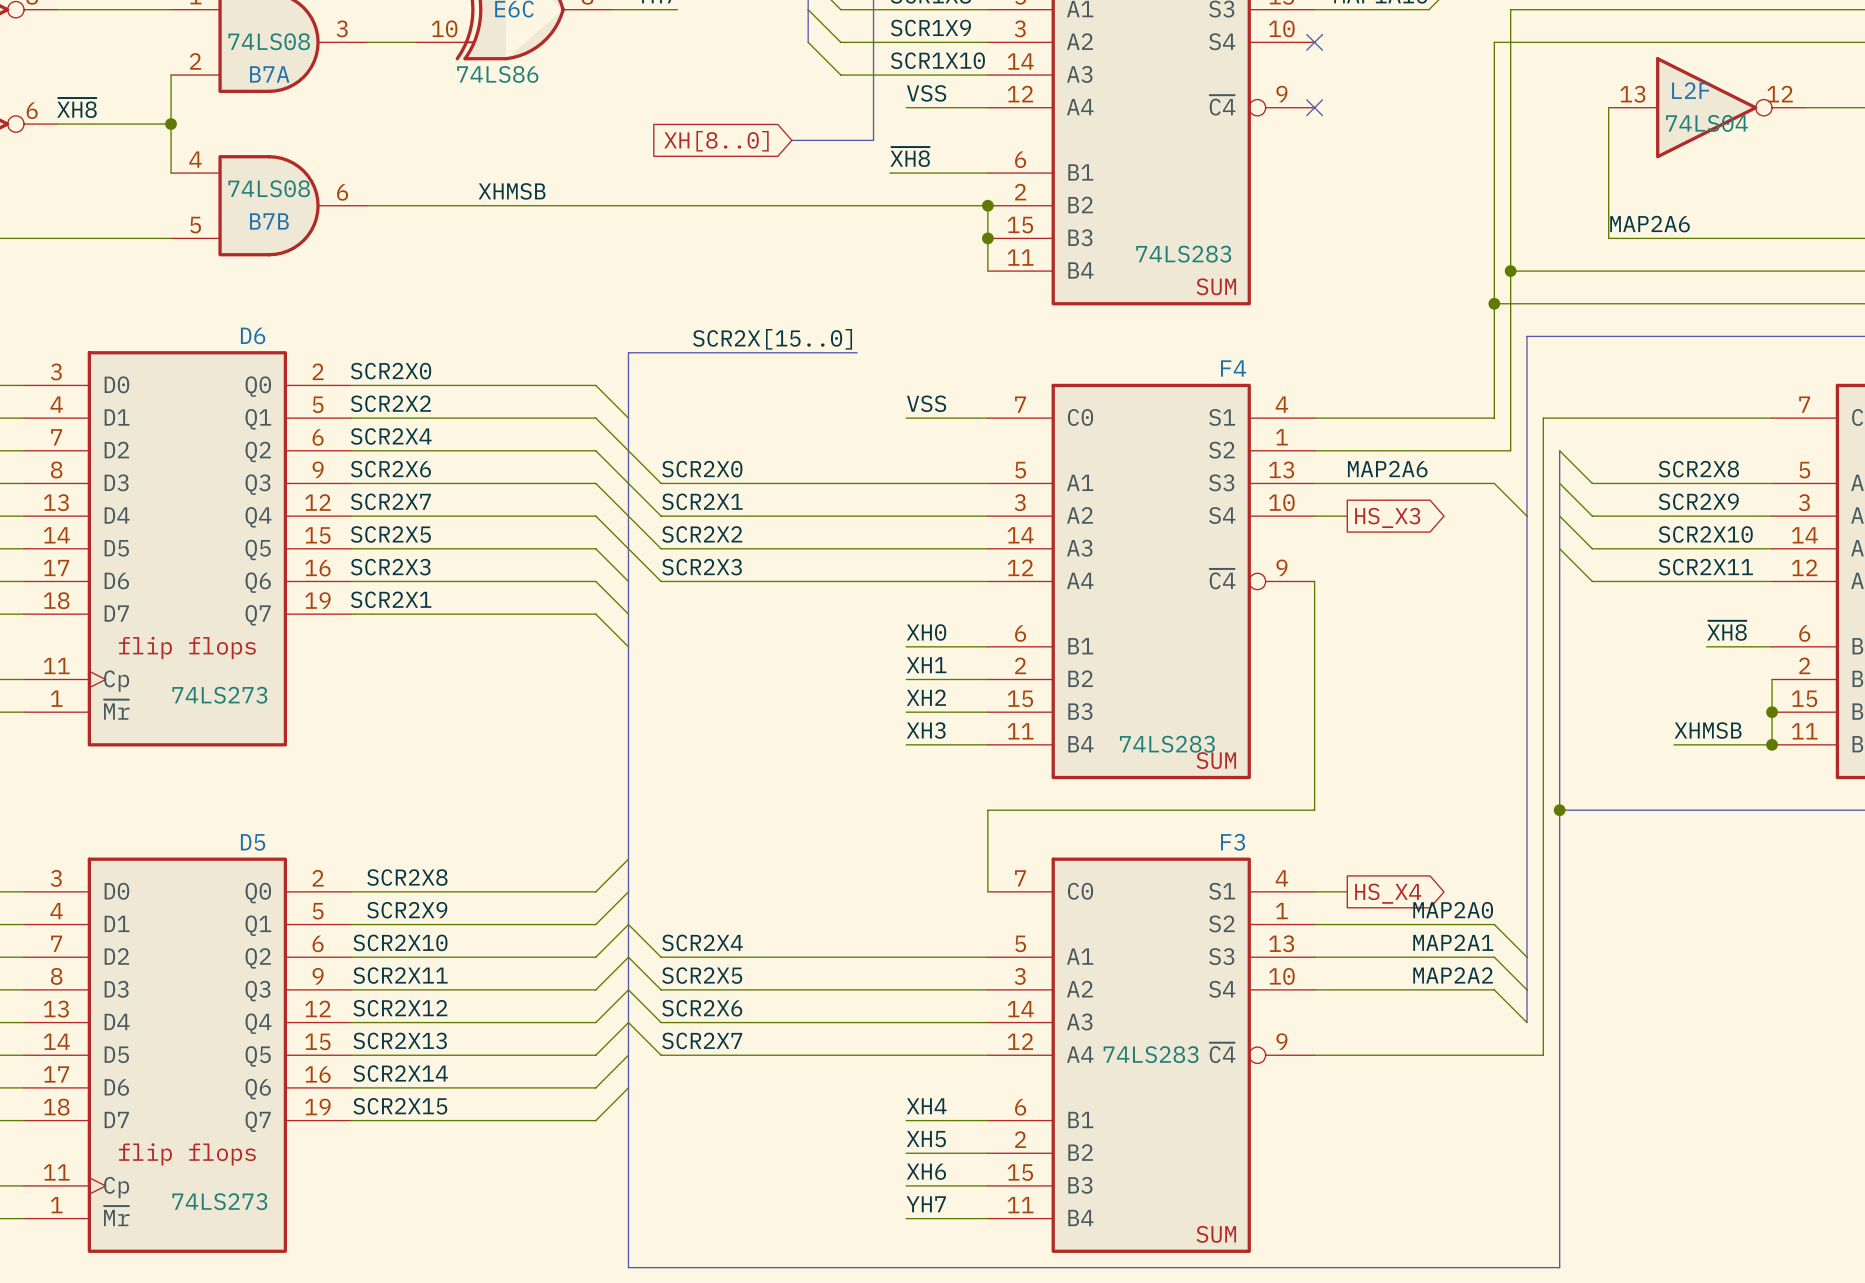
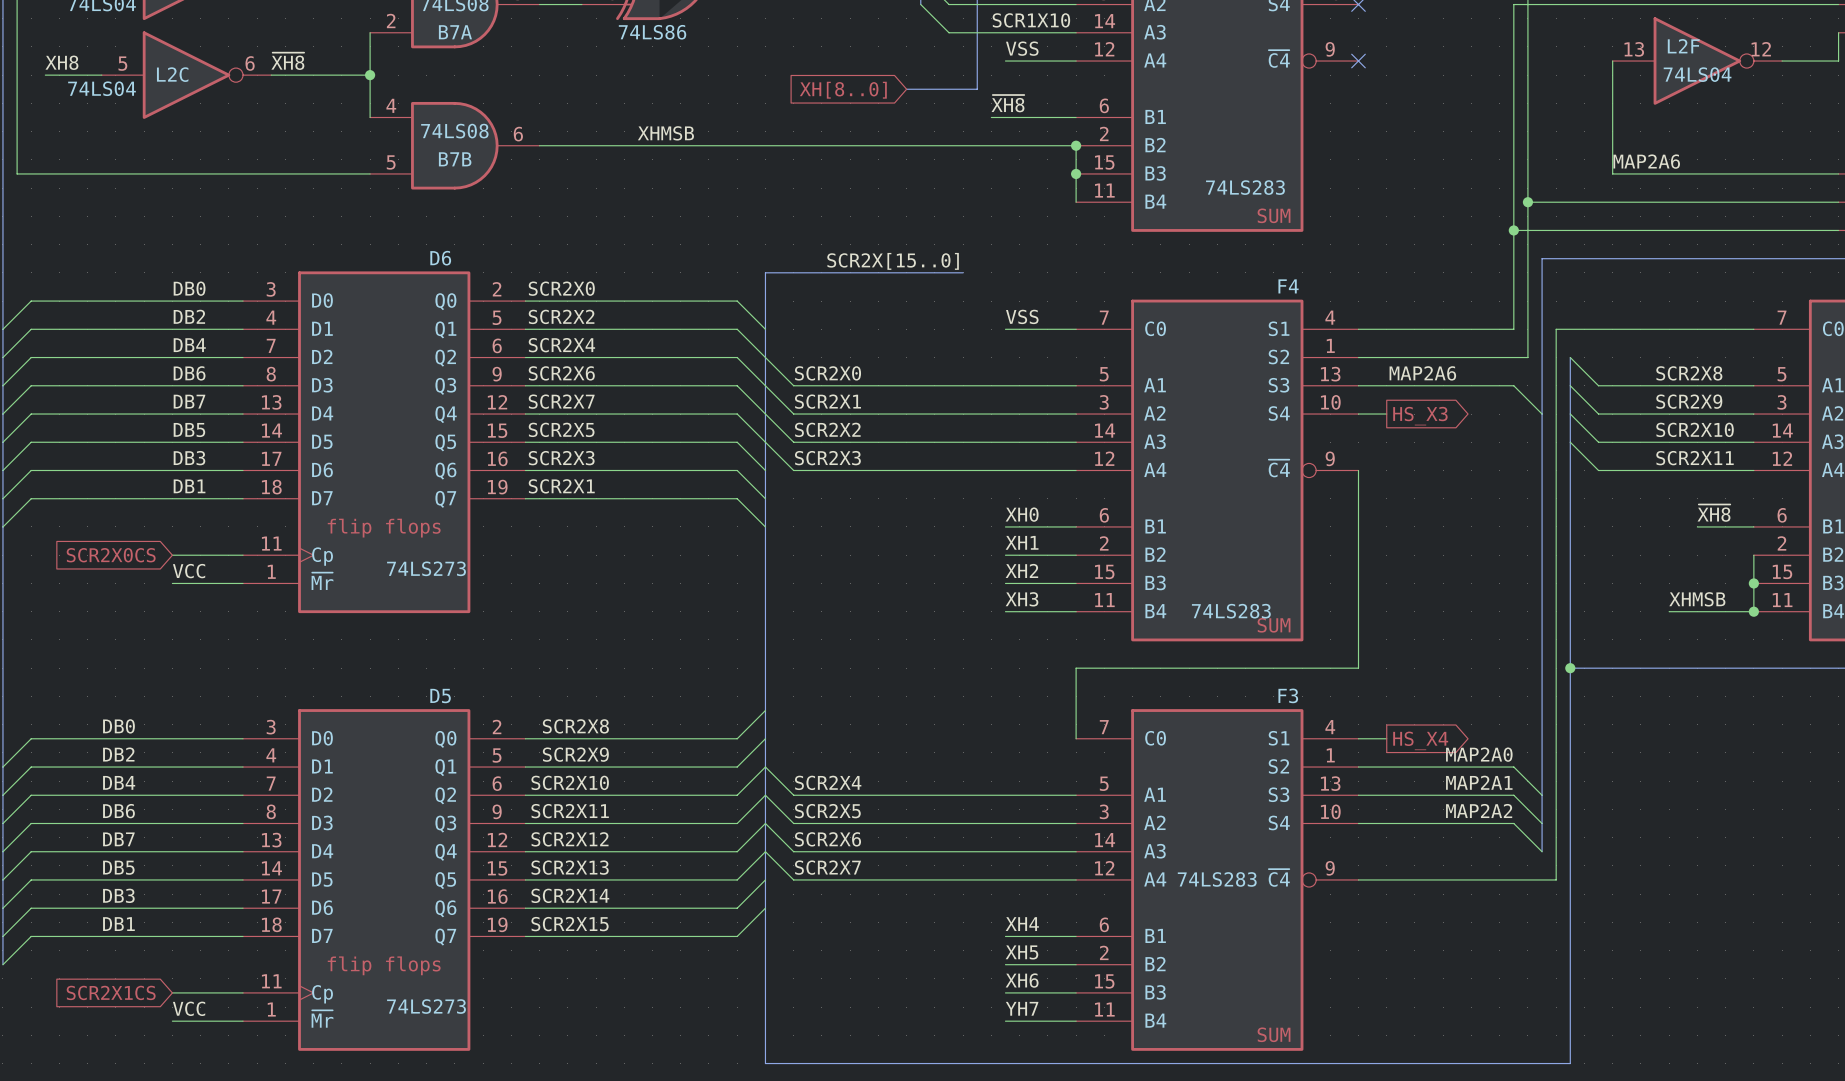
D6 value position: 74LS273 (219, 695) -> 74LS273 (426, 568)
D5 value position: 74LS273 (219, 1201) -> 74LS273 (426, 1006)

